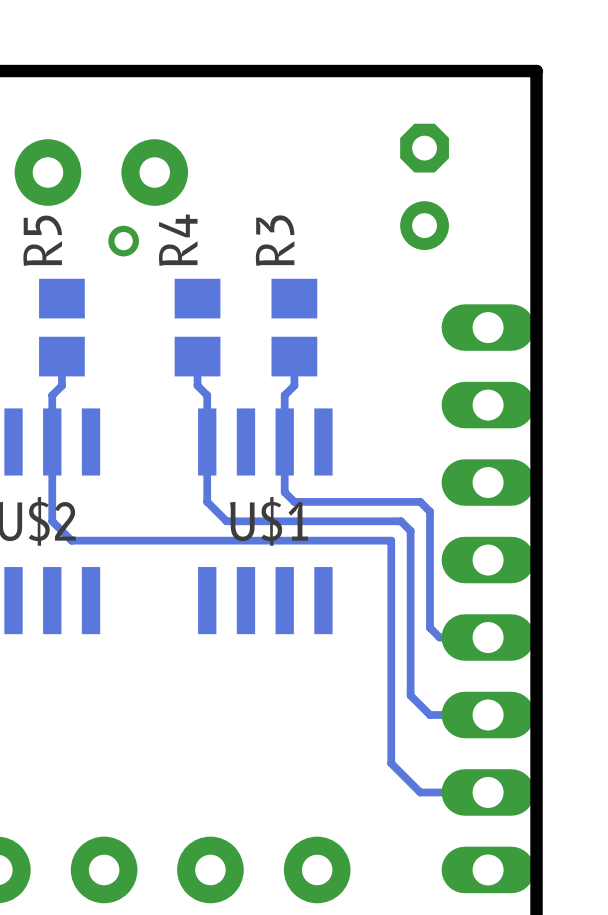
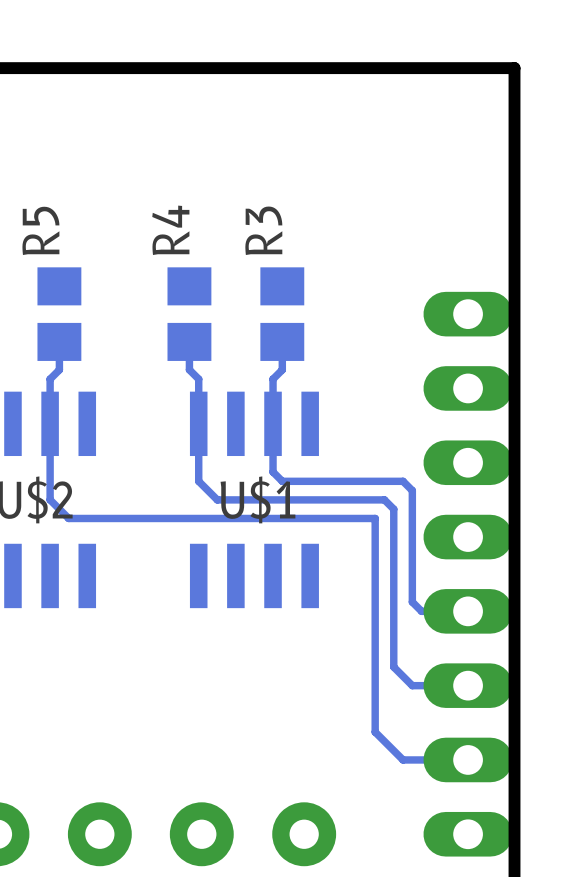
part: (101, 172) -> none
part: (424, 186) -> none
via: (123, 241) -> none

